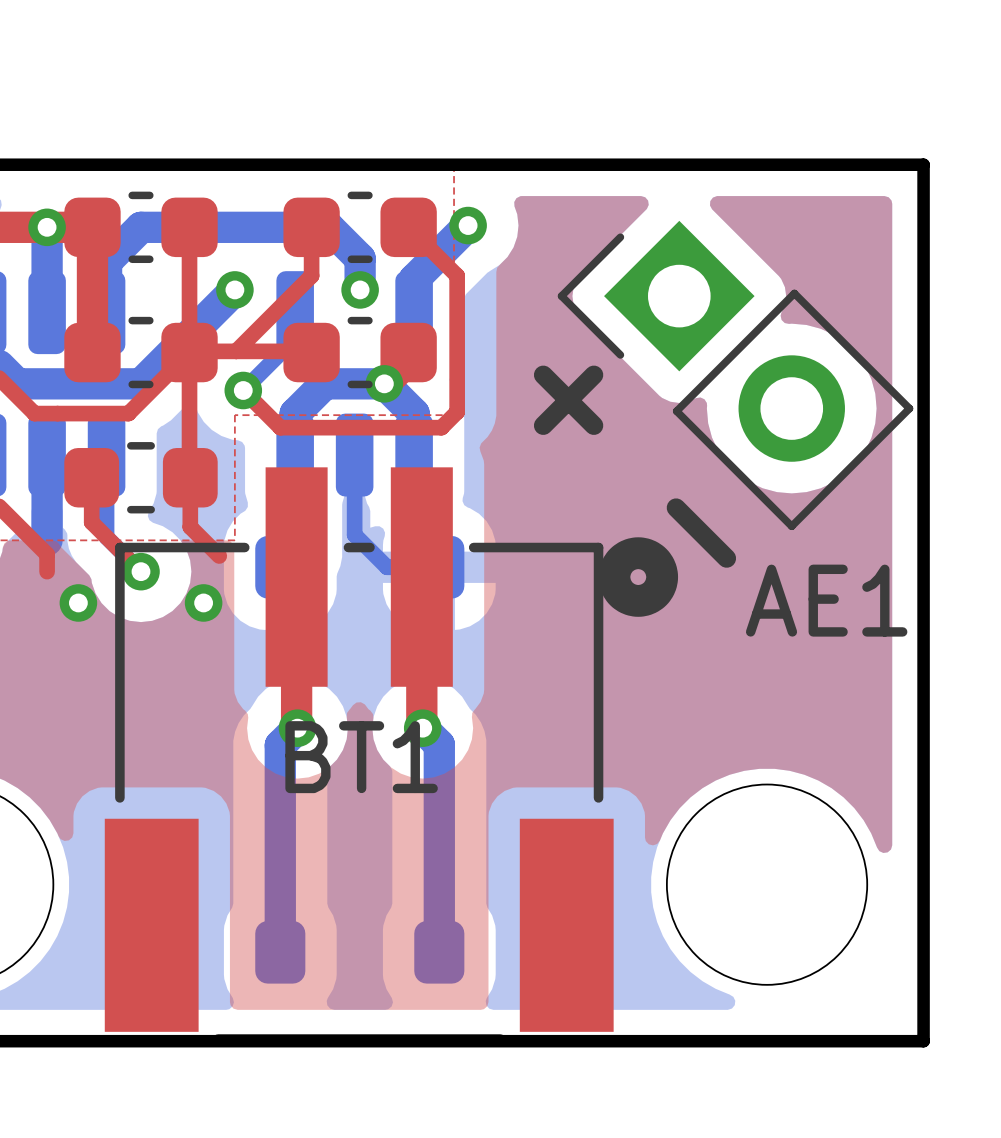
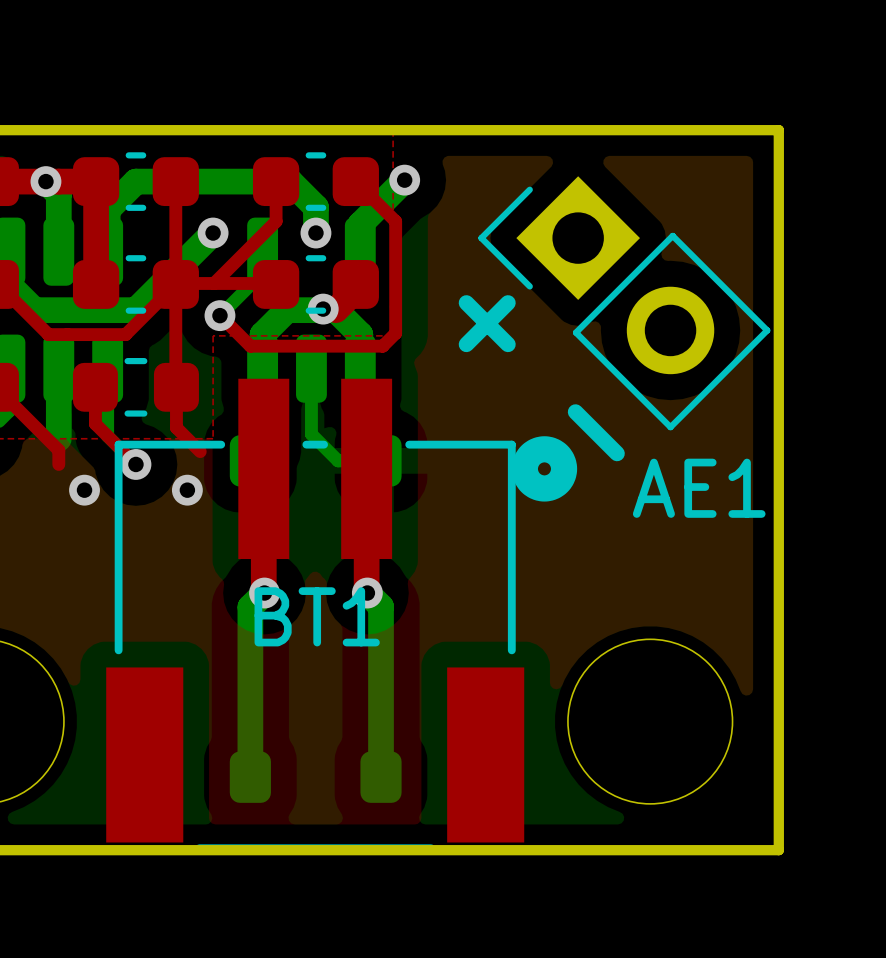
via position: (47, 227) -> (45, 181)
via position: (384, 383) -> (323, 309)

